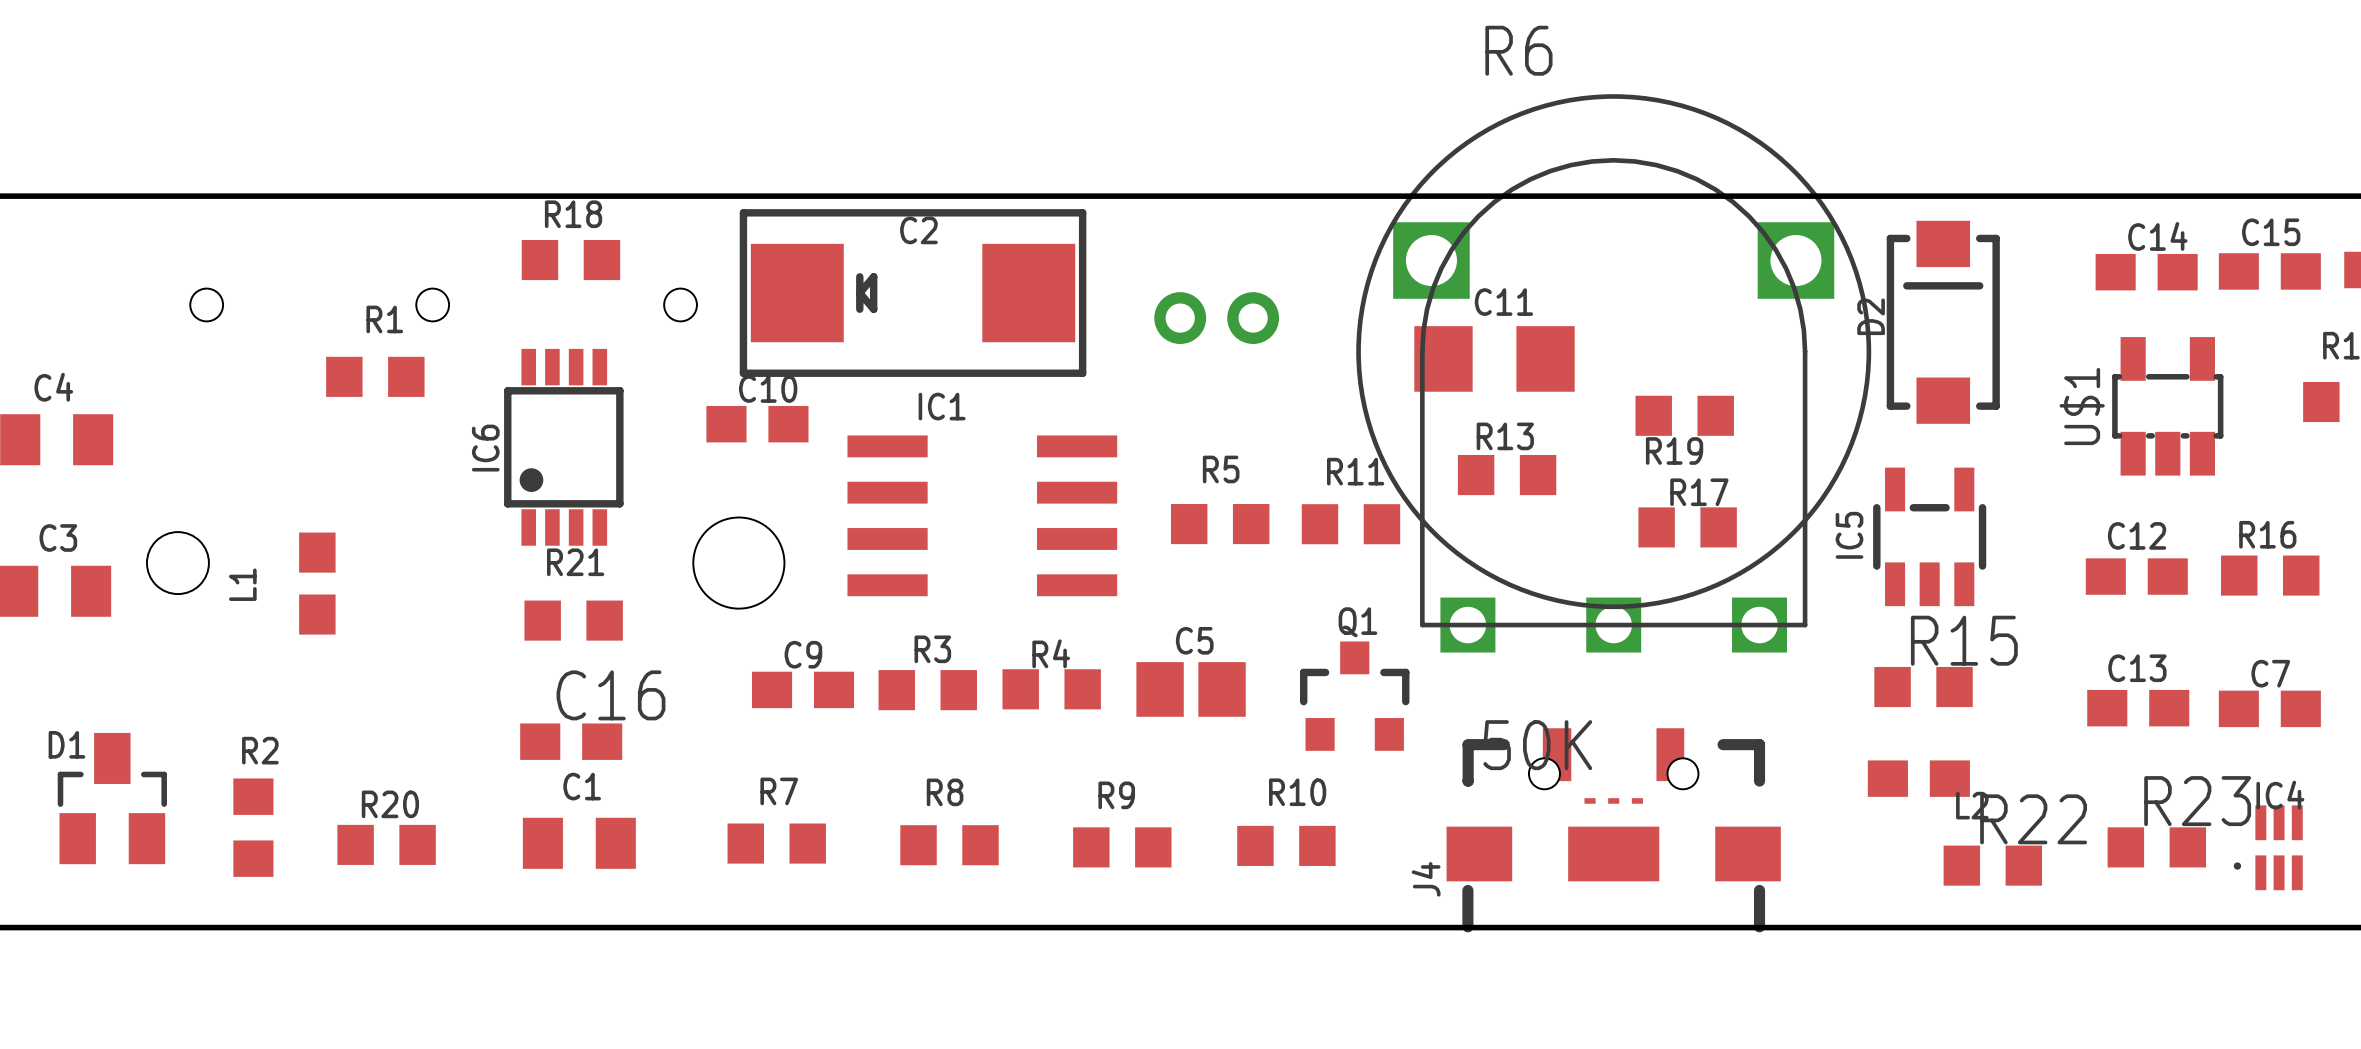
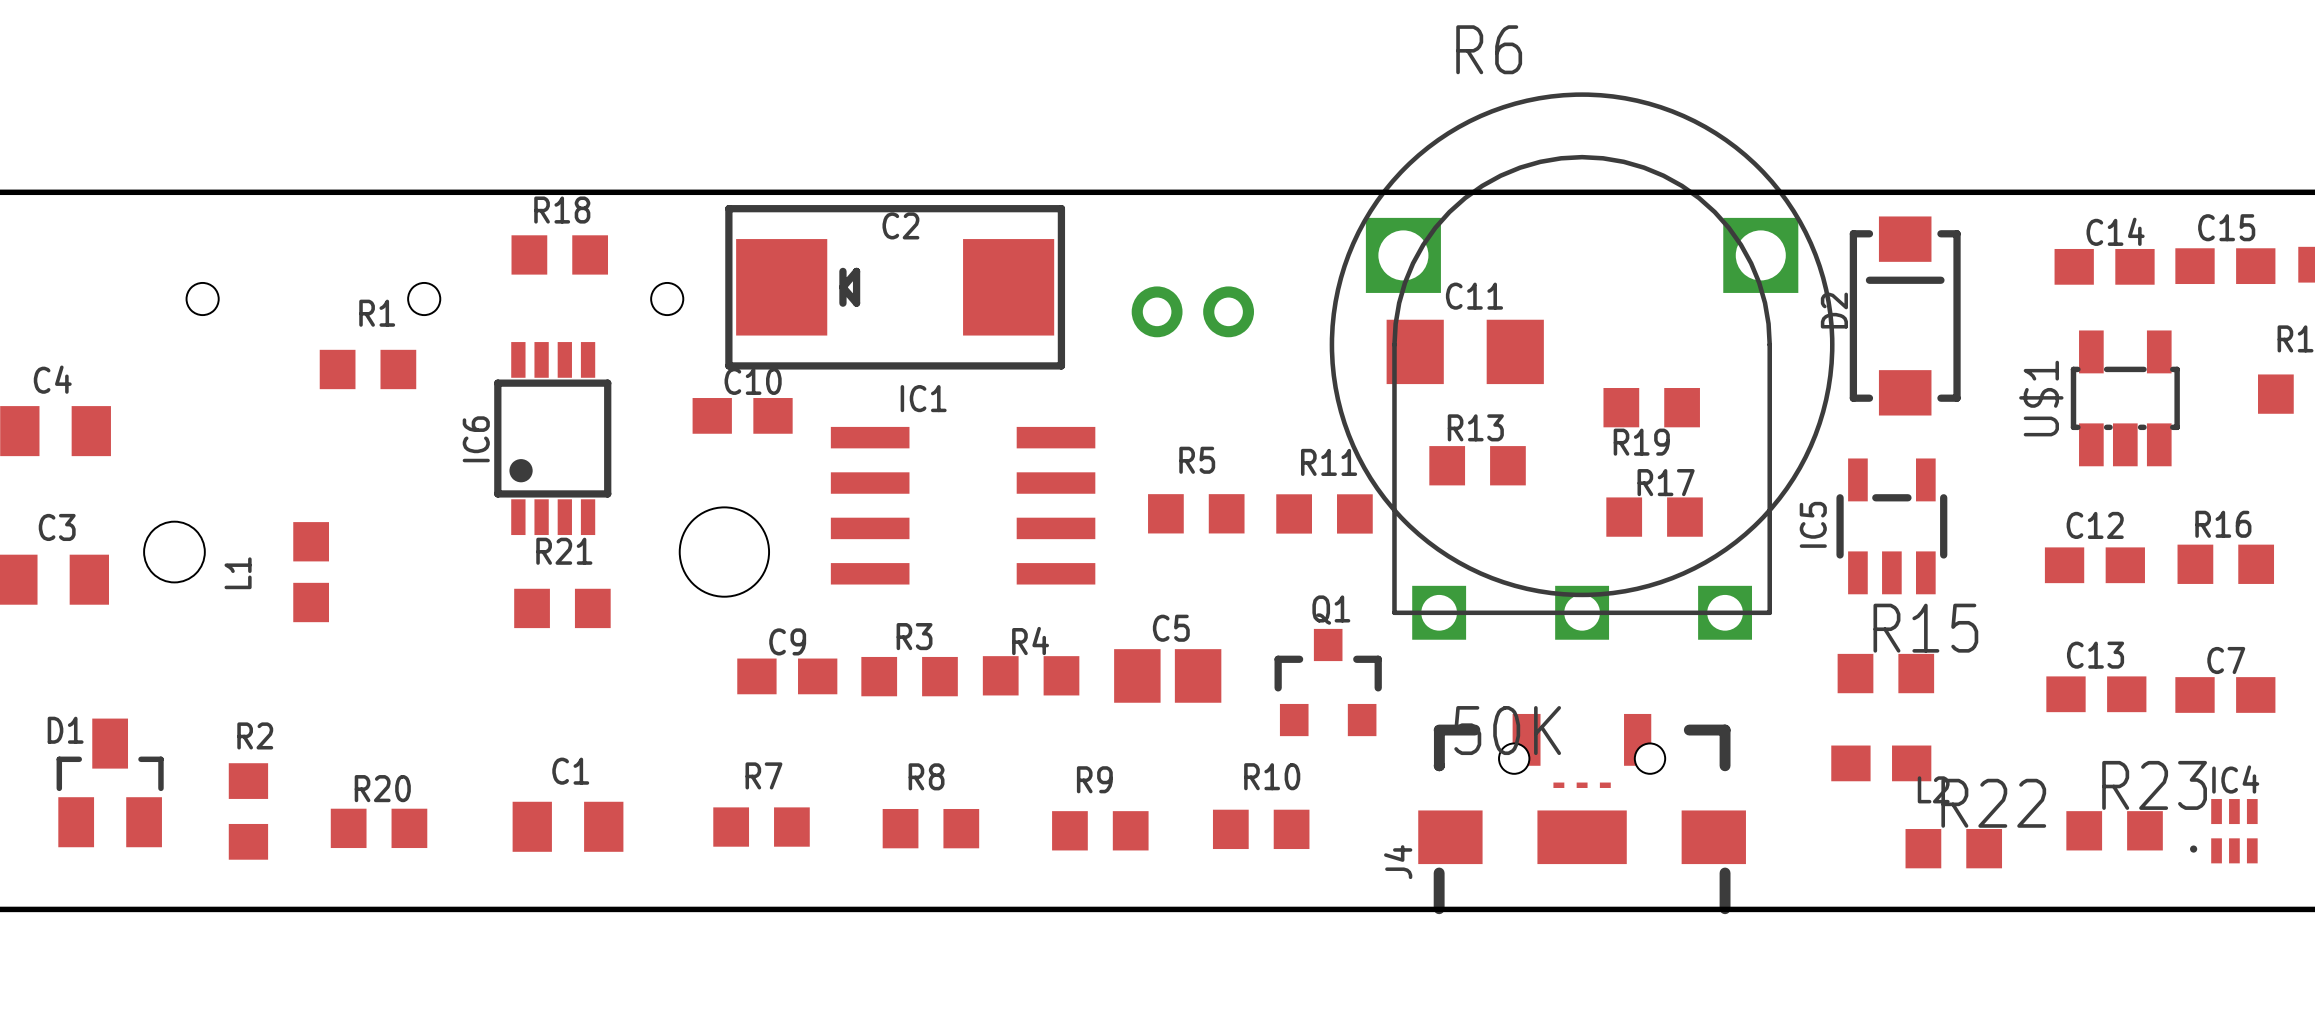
C16: (571, 741) -> none
IC4 footprint: [2233, 805, 2303, 891] -> [2190, 799, 2258, 864]

